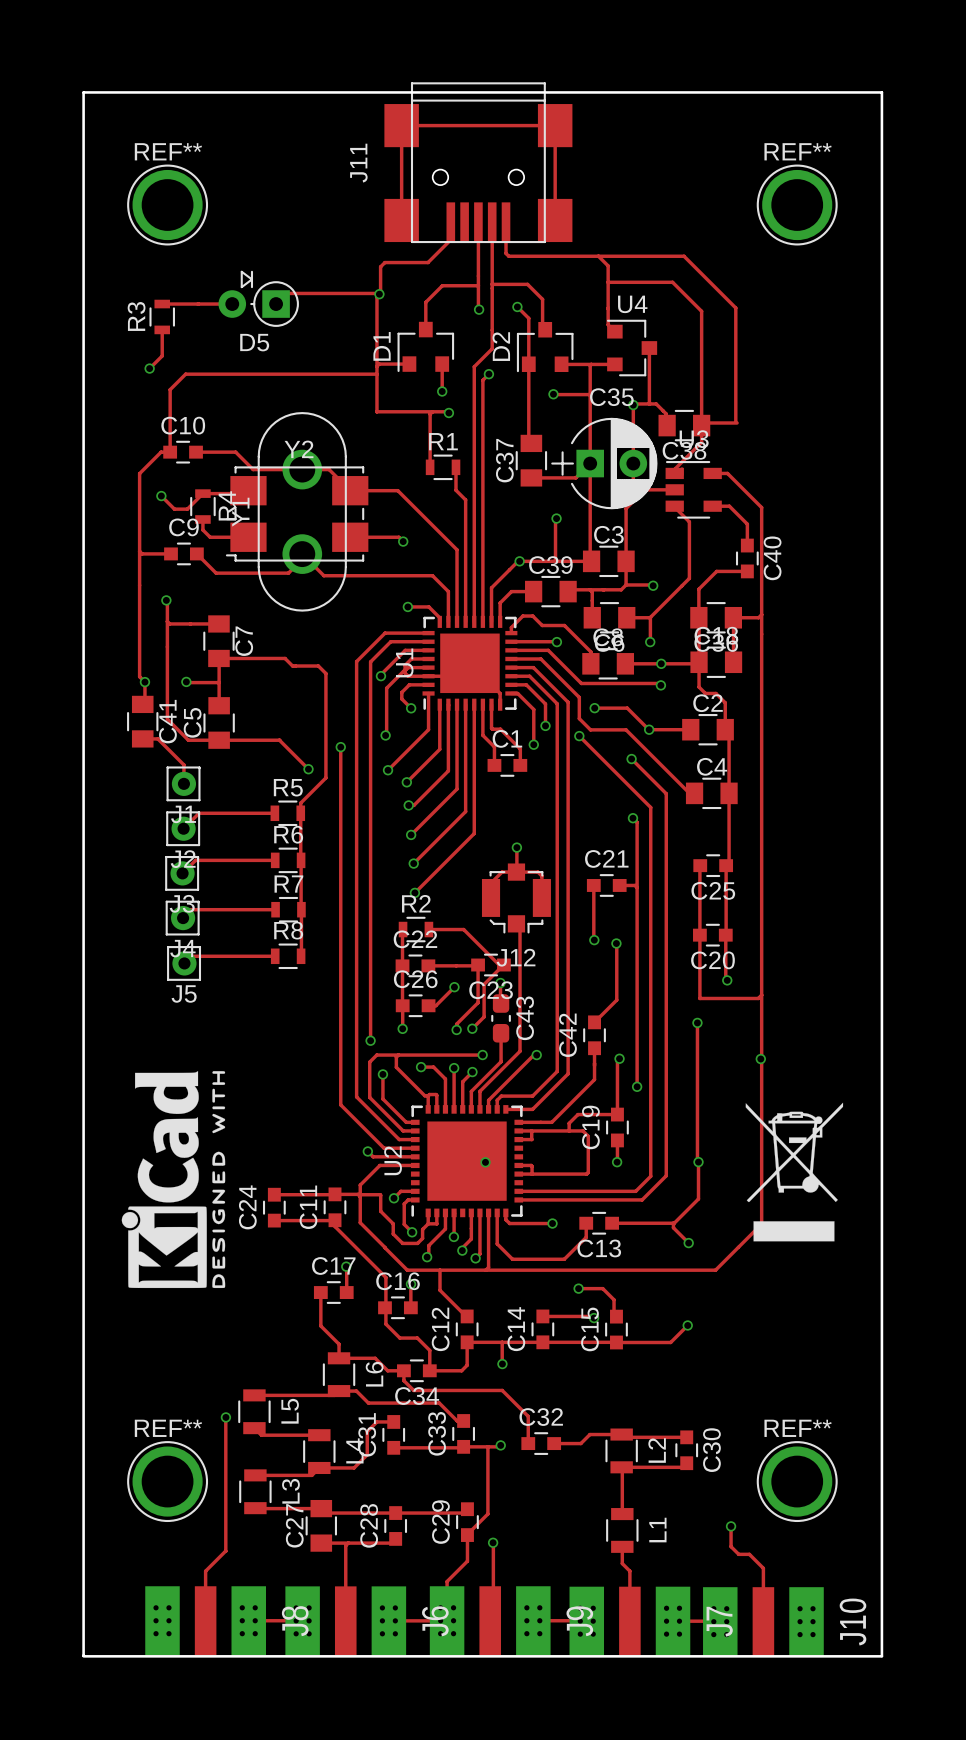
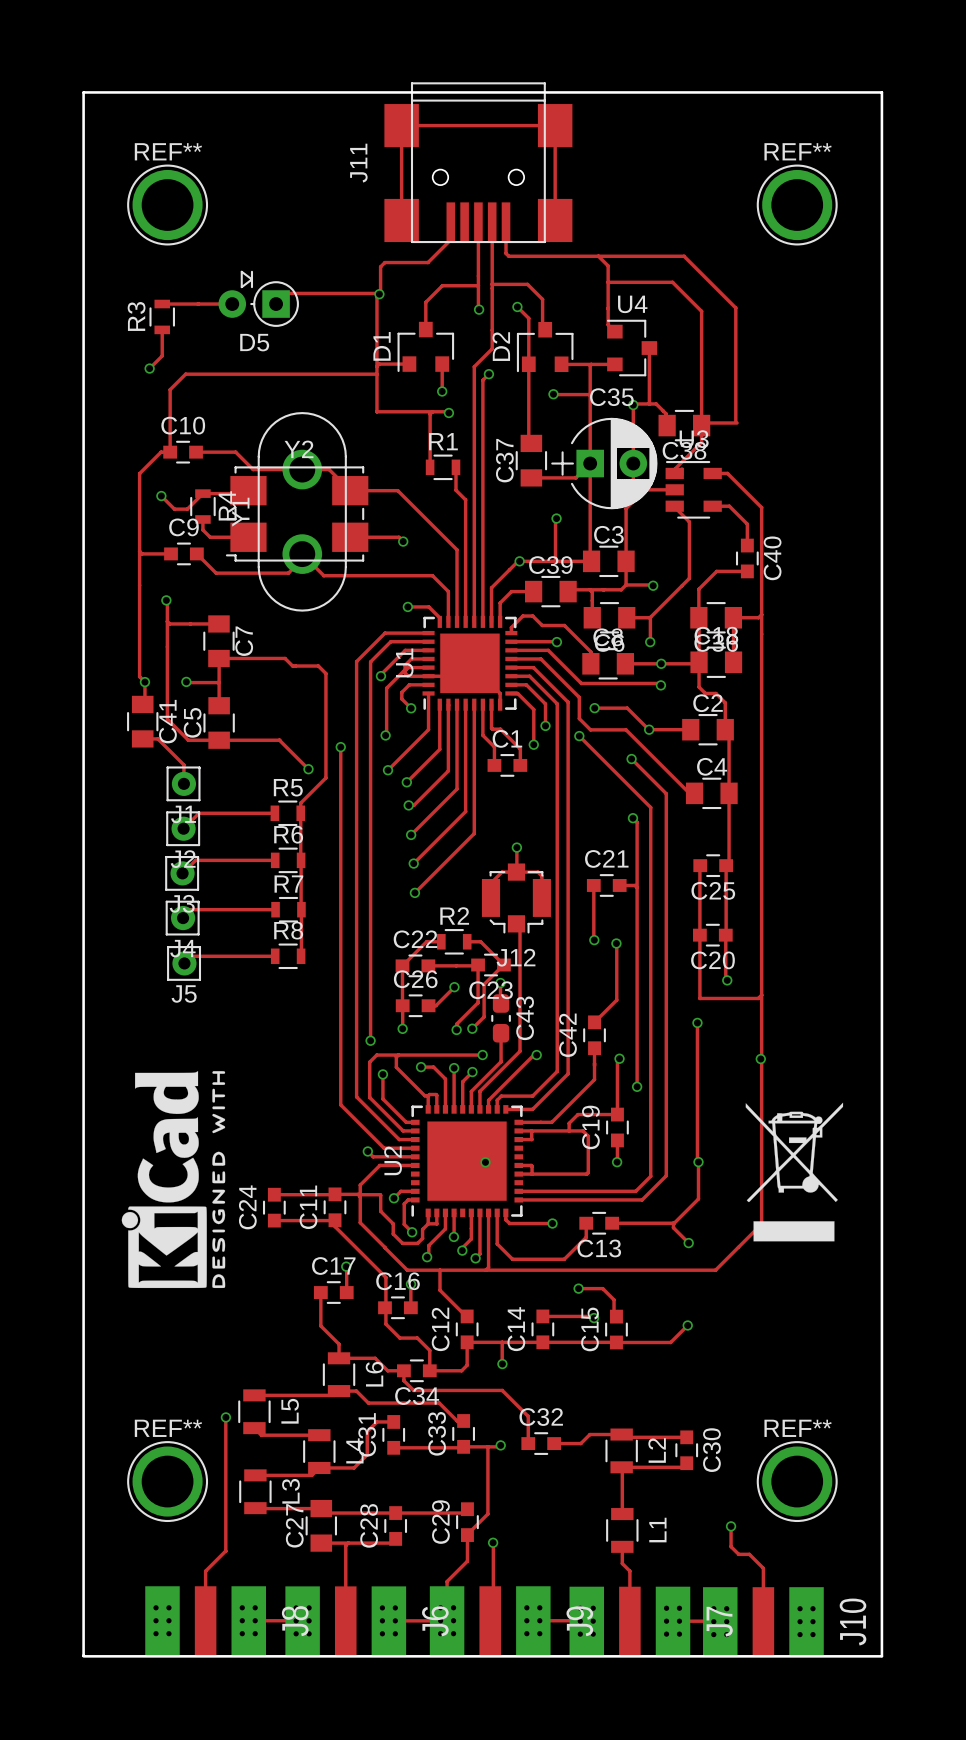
track: (403, 929) (402, 965) -> (441, 941) (426, 941) (402, 965)
R2 position: (415, 929) -> (454, 941)
track: (428, 929) (463, 929) (499, 965) (503, 965) -> (467, 941) (480, 941) (503, 965)

